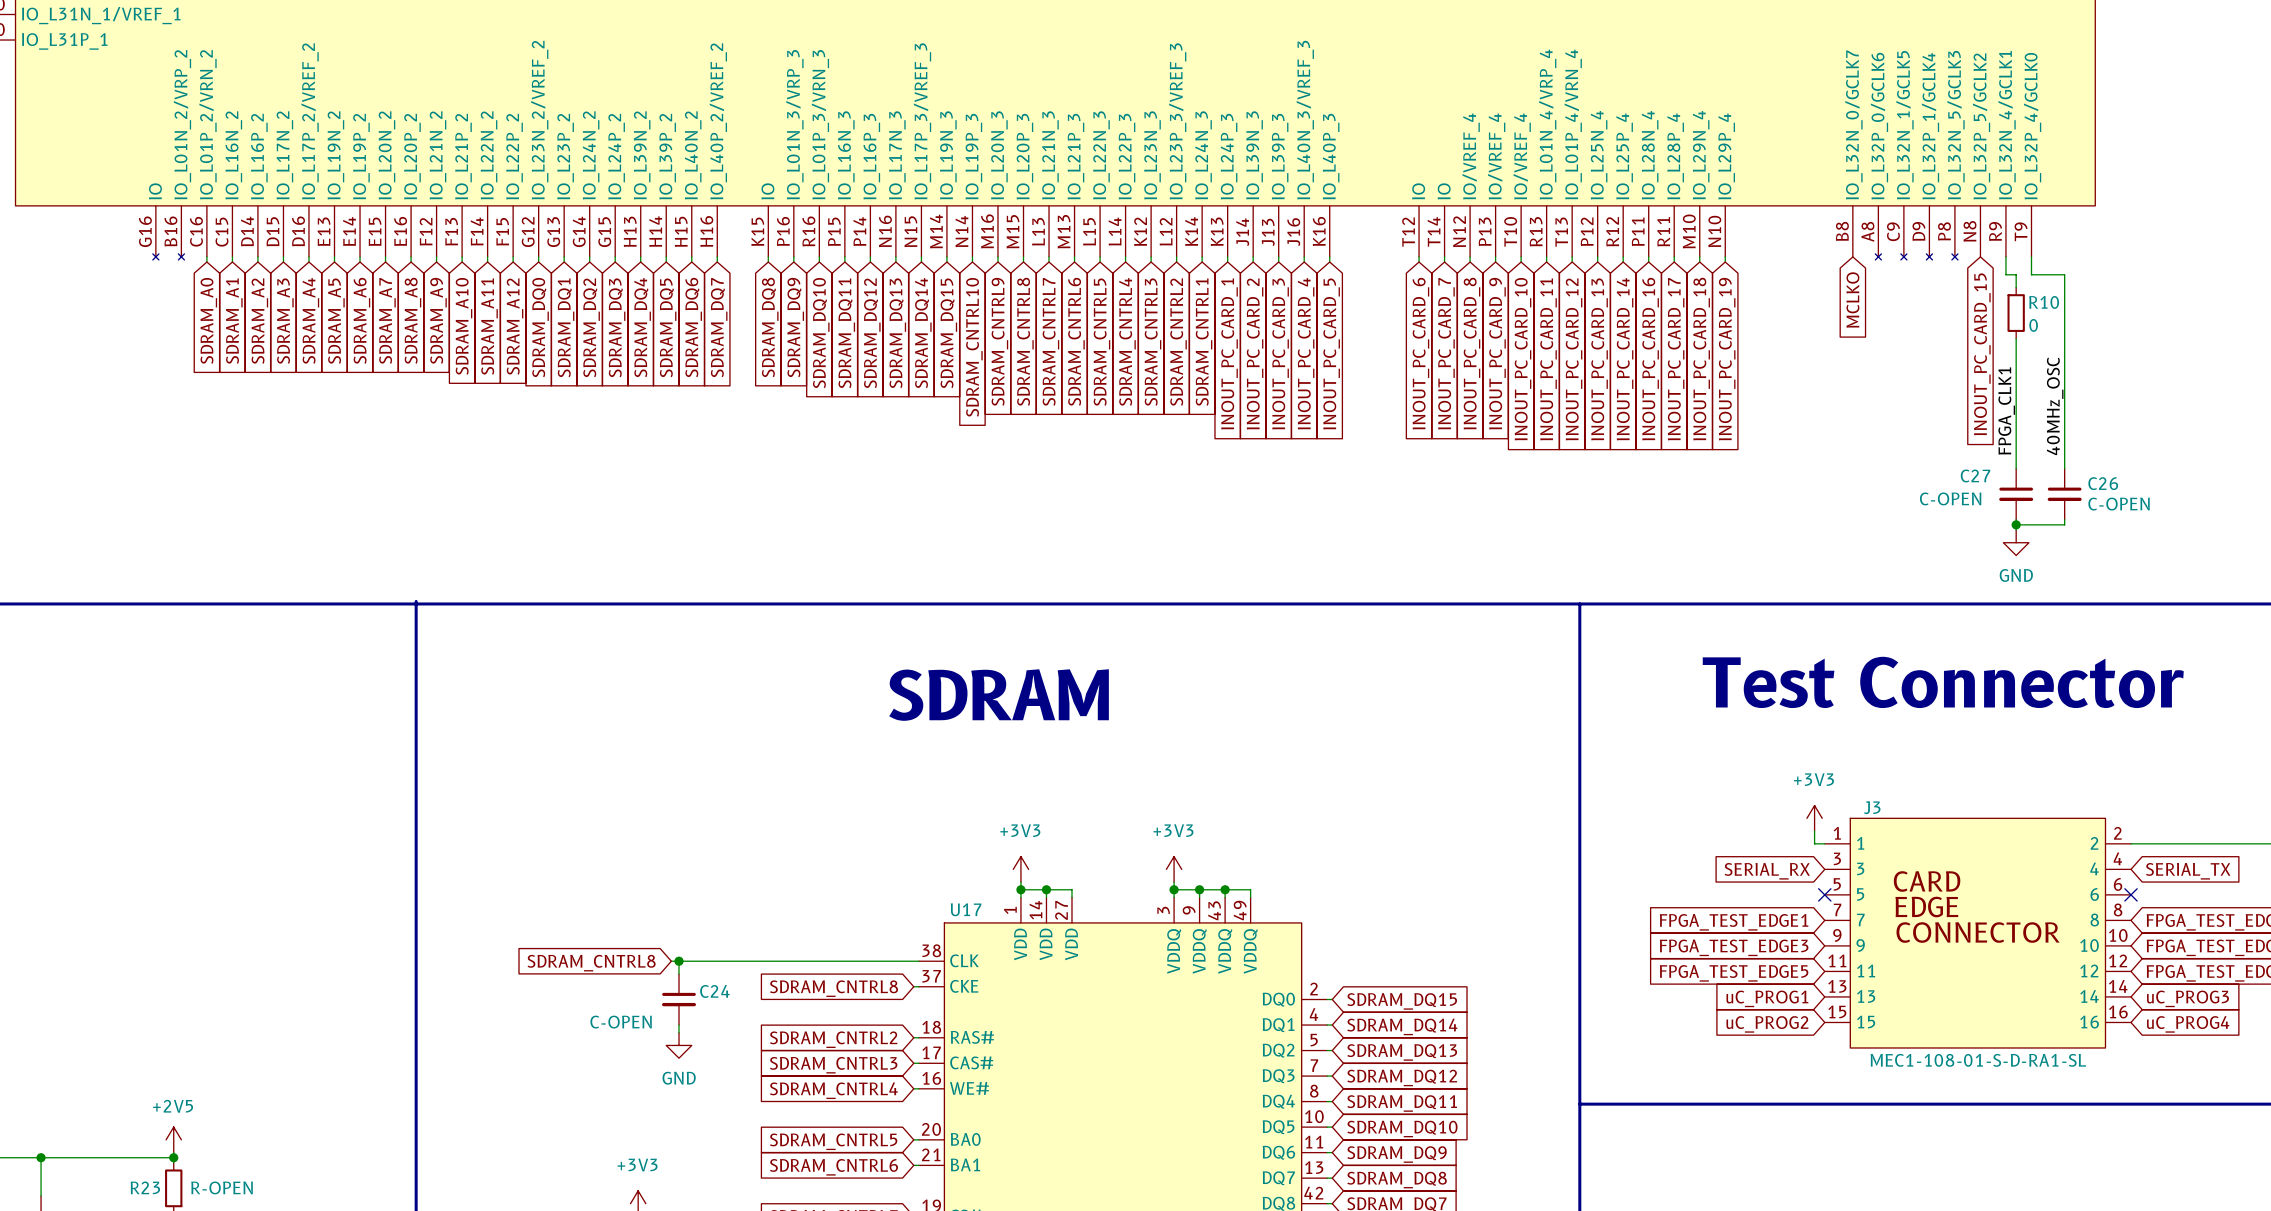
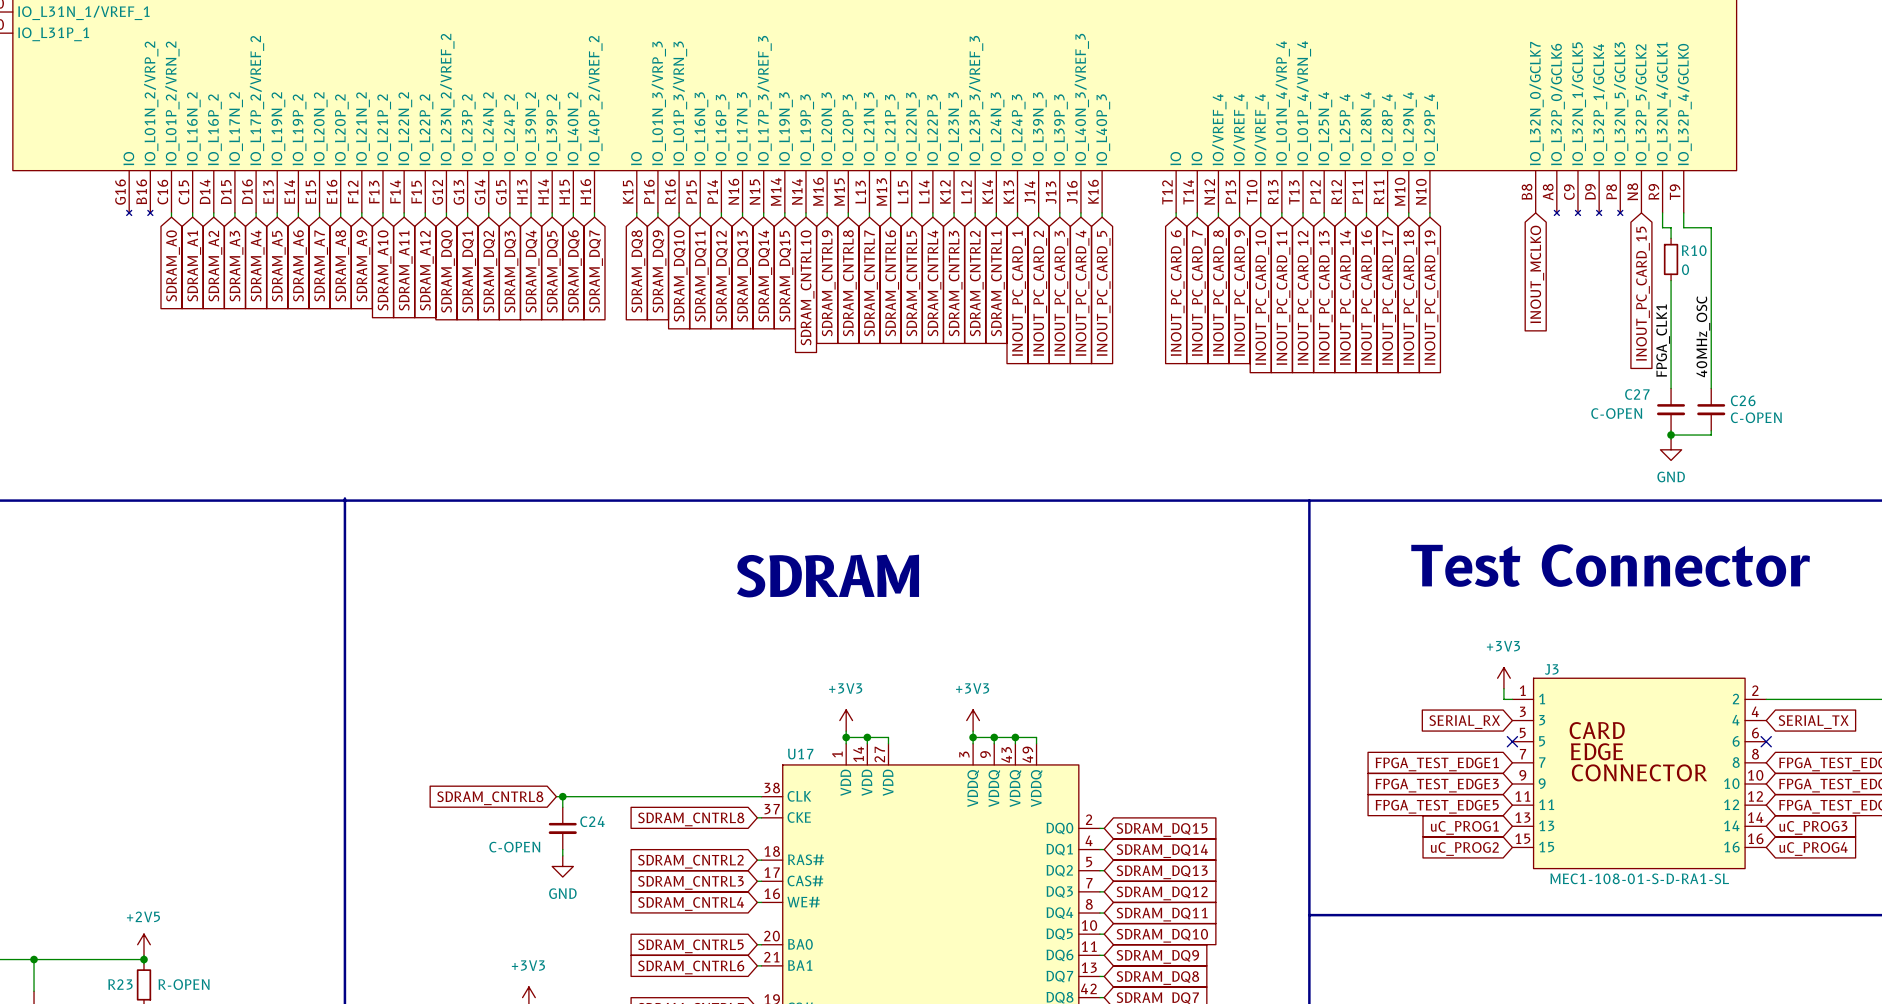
global label: MCLKO (1852, 300) -> INOUT_MCLKO (1537, 274)

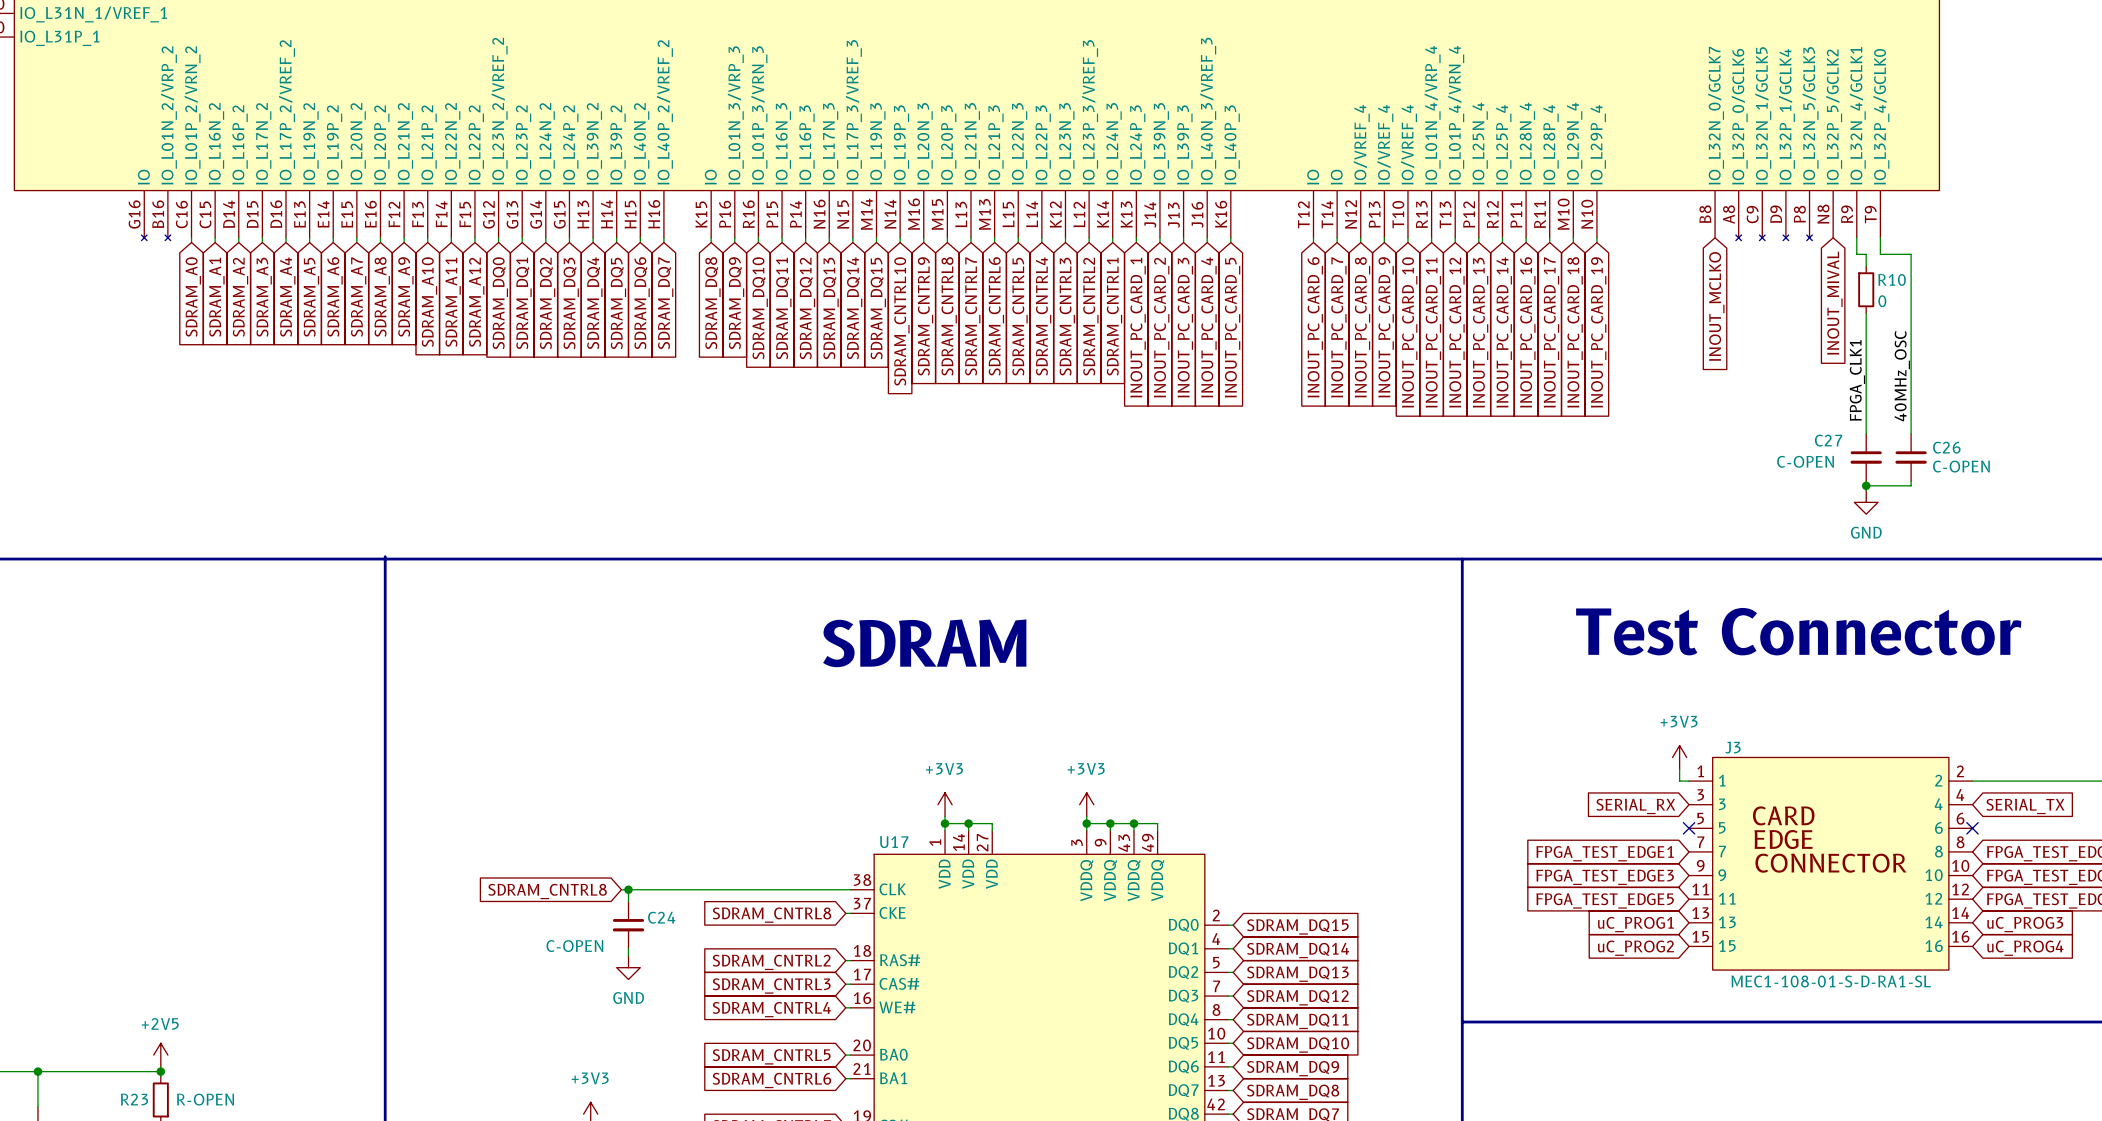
global label: INOUT_PC_CARD_15 (1643, 293) -> INOUT_MIVAL (1834, 303)

